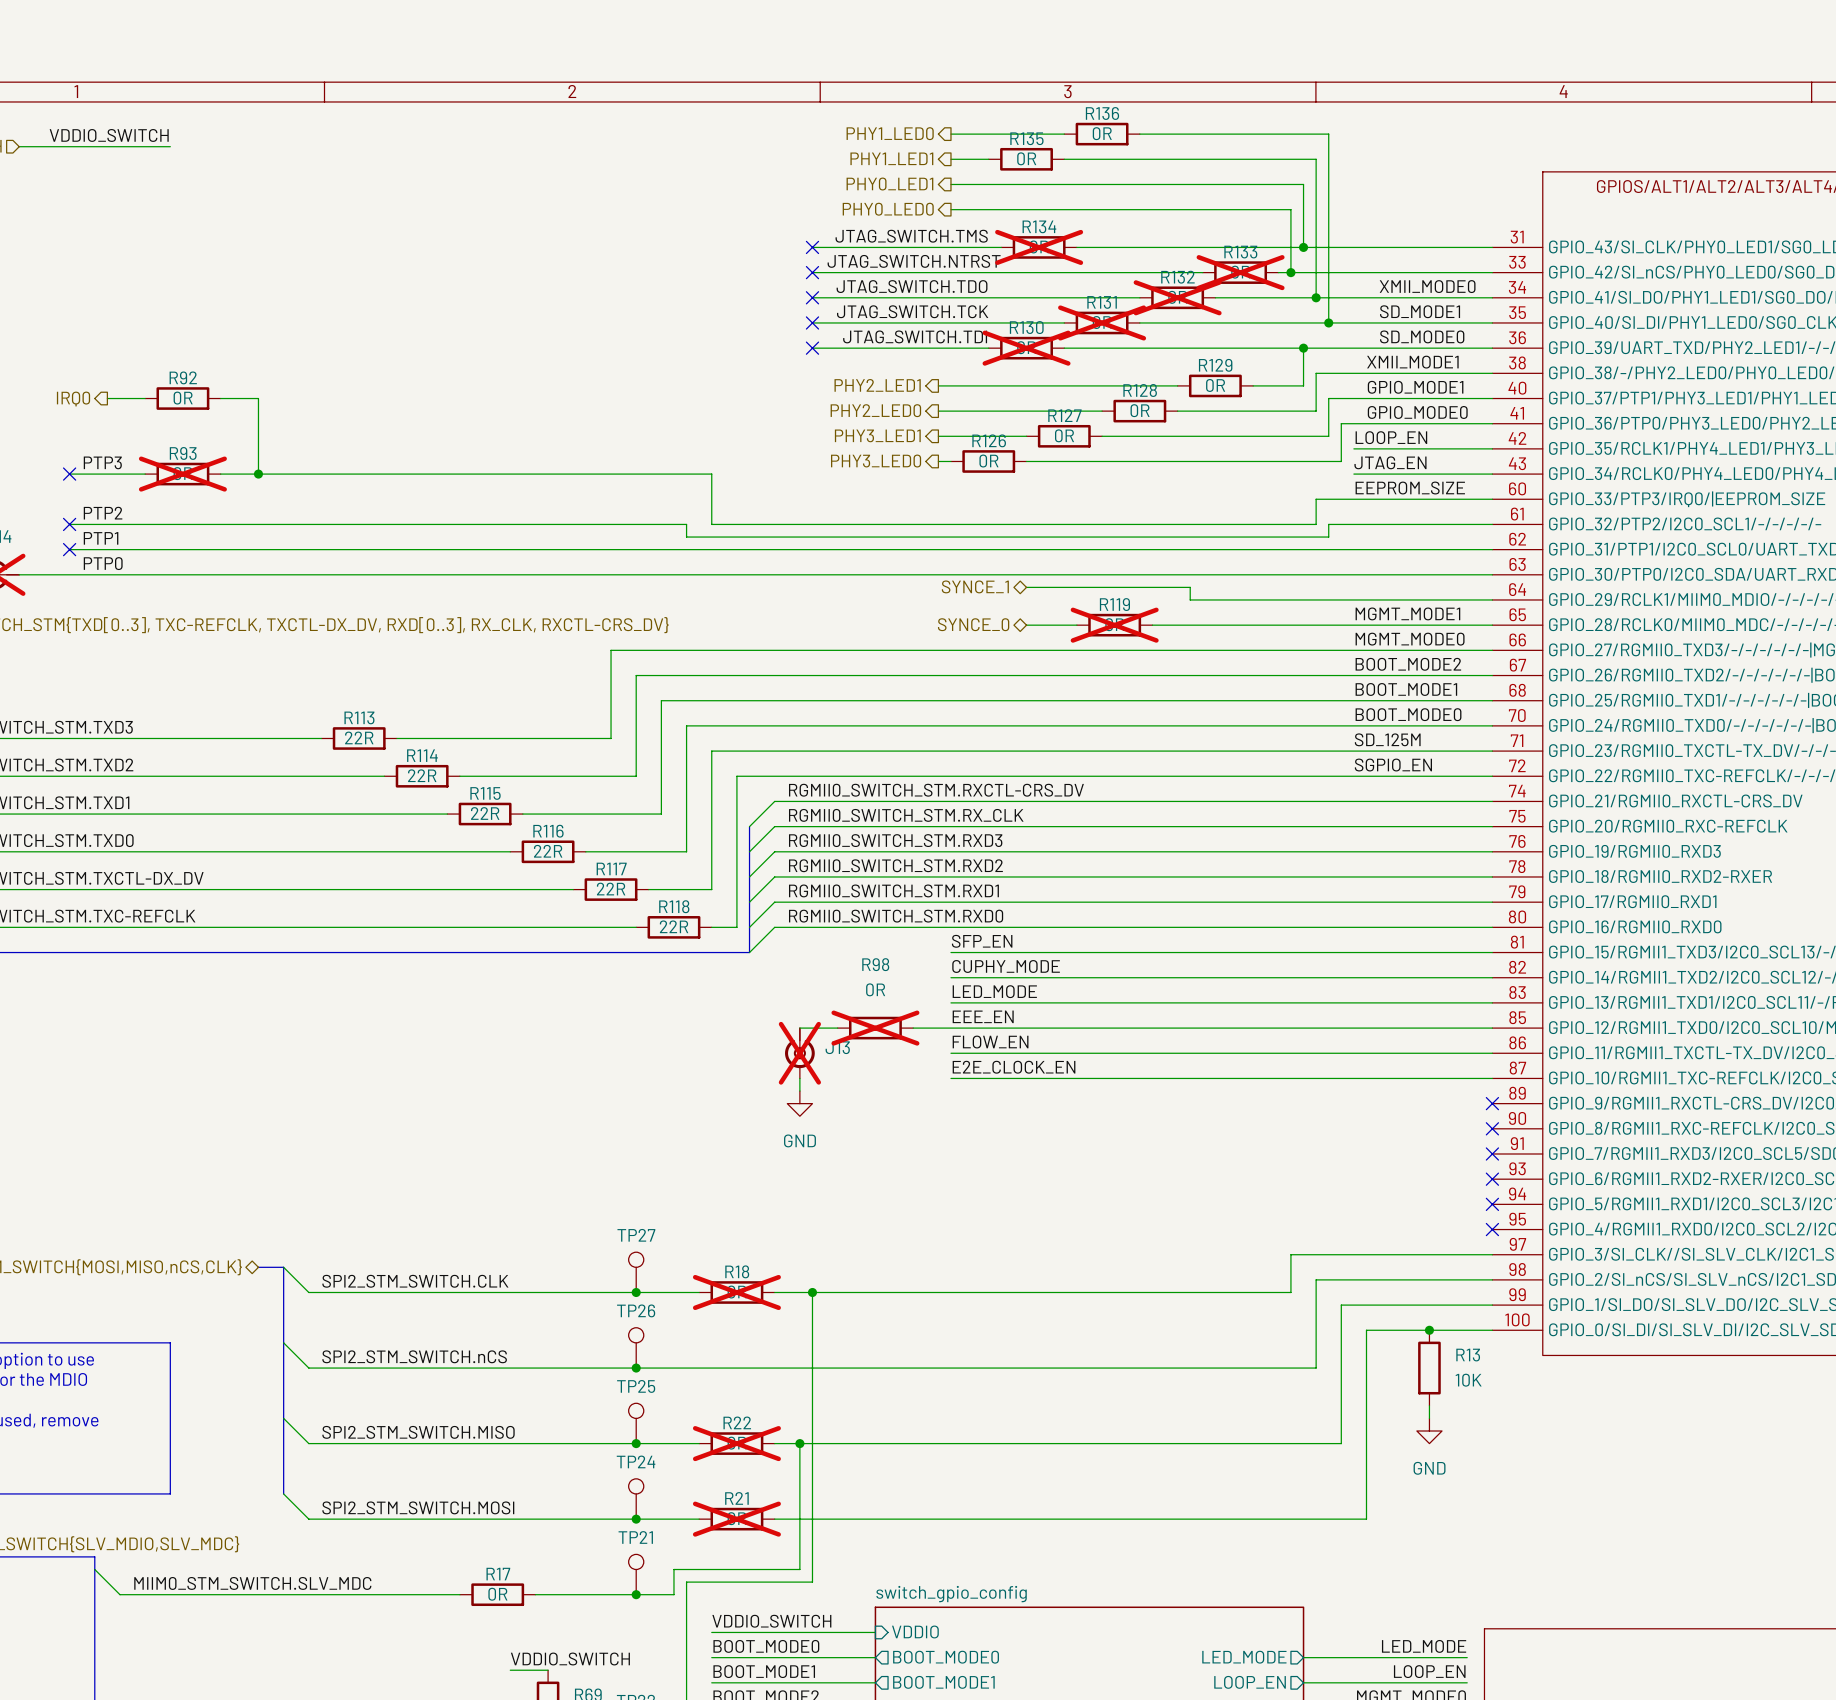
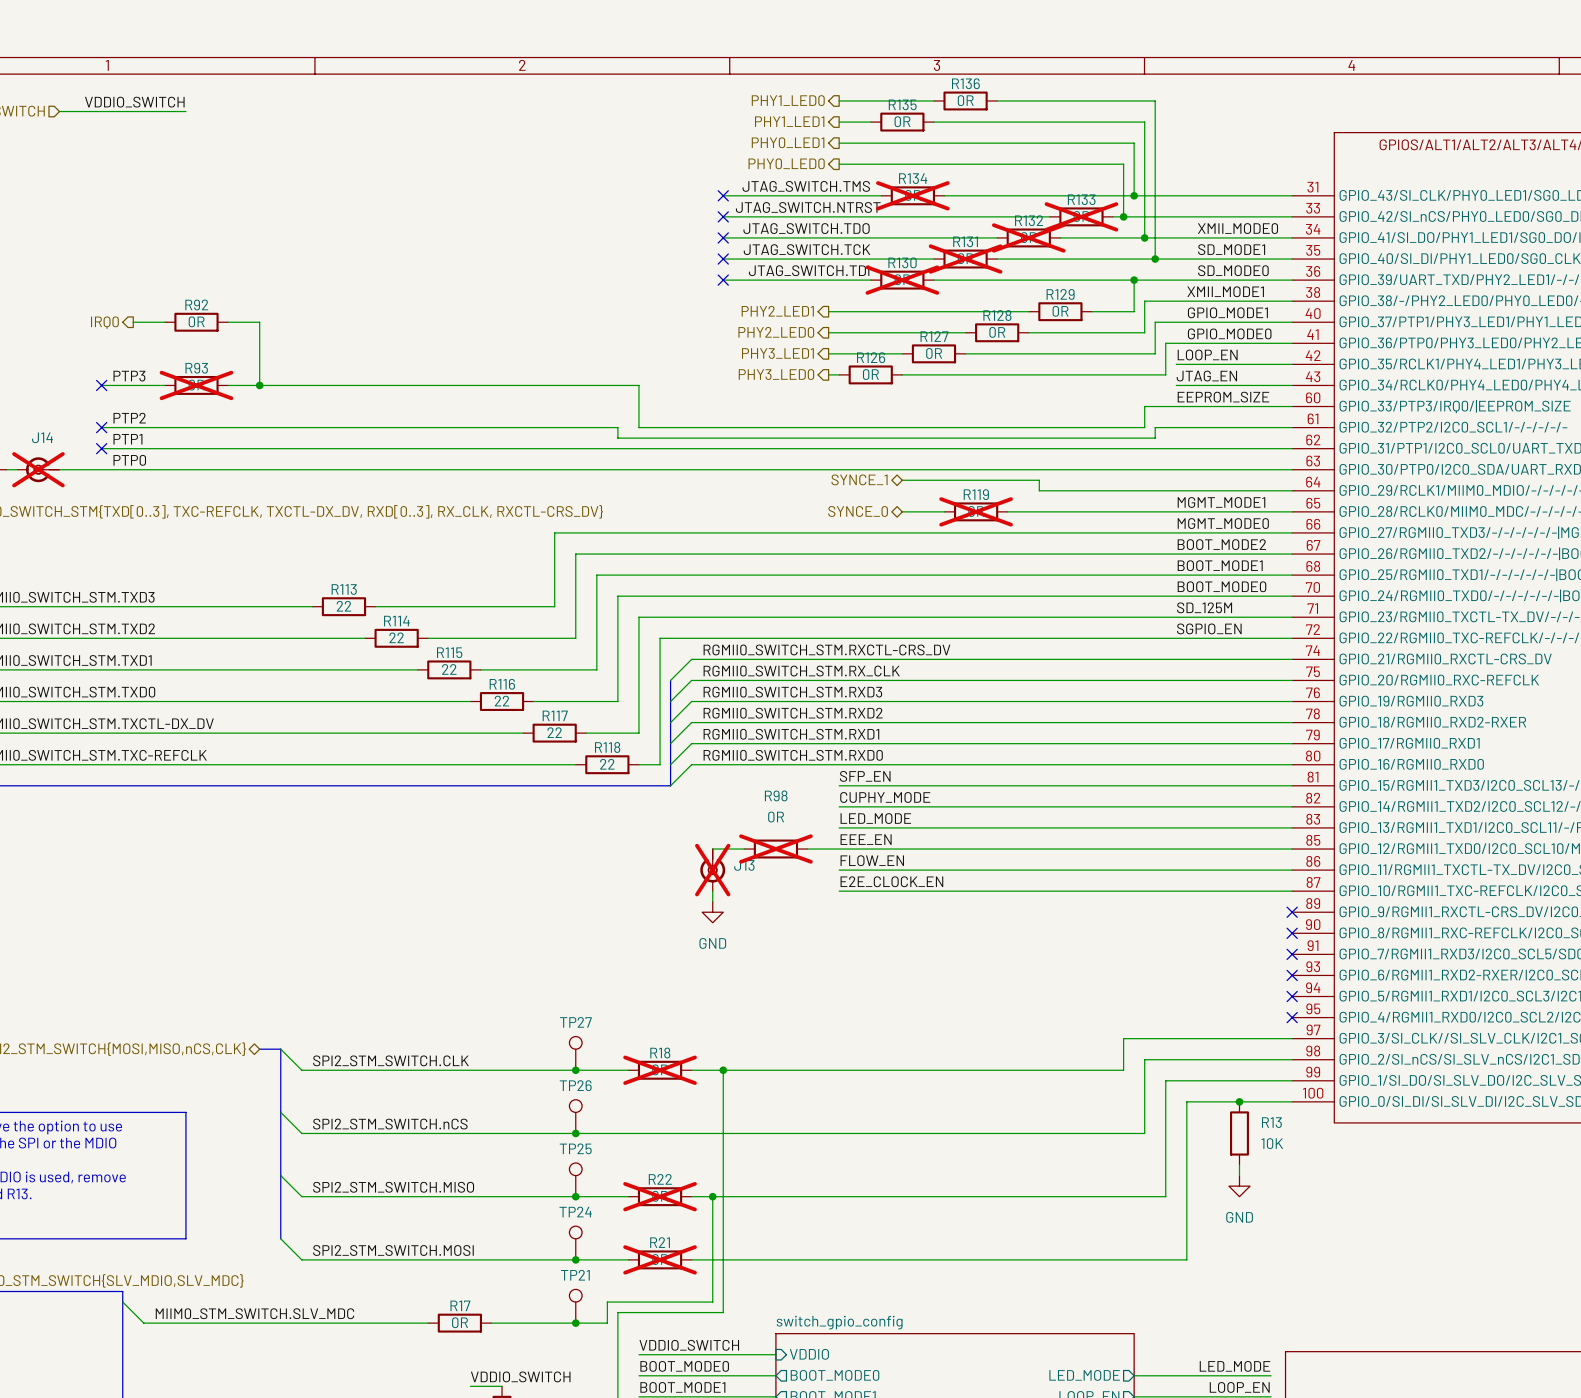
R113 value: 22R (359, 737) -> 22 (343, 606)
R114 value: 22R (422, 775) -> 22 (396, 637)
R115 value: 22R (485, 813) -> 22 (449, 669)
R116 value: 22R (548, 851) -> 22 (502, 701)
R117 value: 22R (611, 889) -> 22 (554, 732)
R118 value: 22R (674, 926) -> 22 (607, 764)

